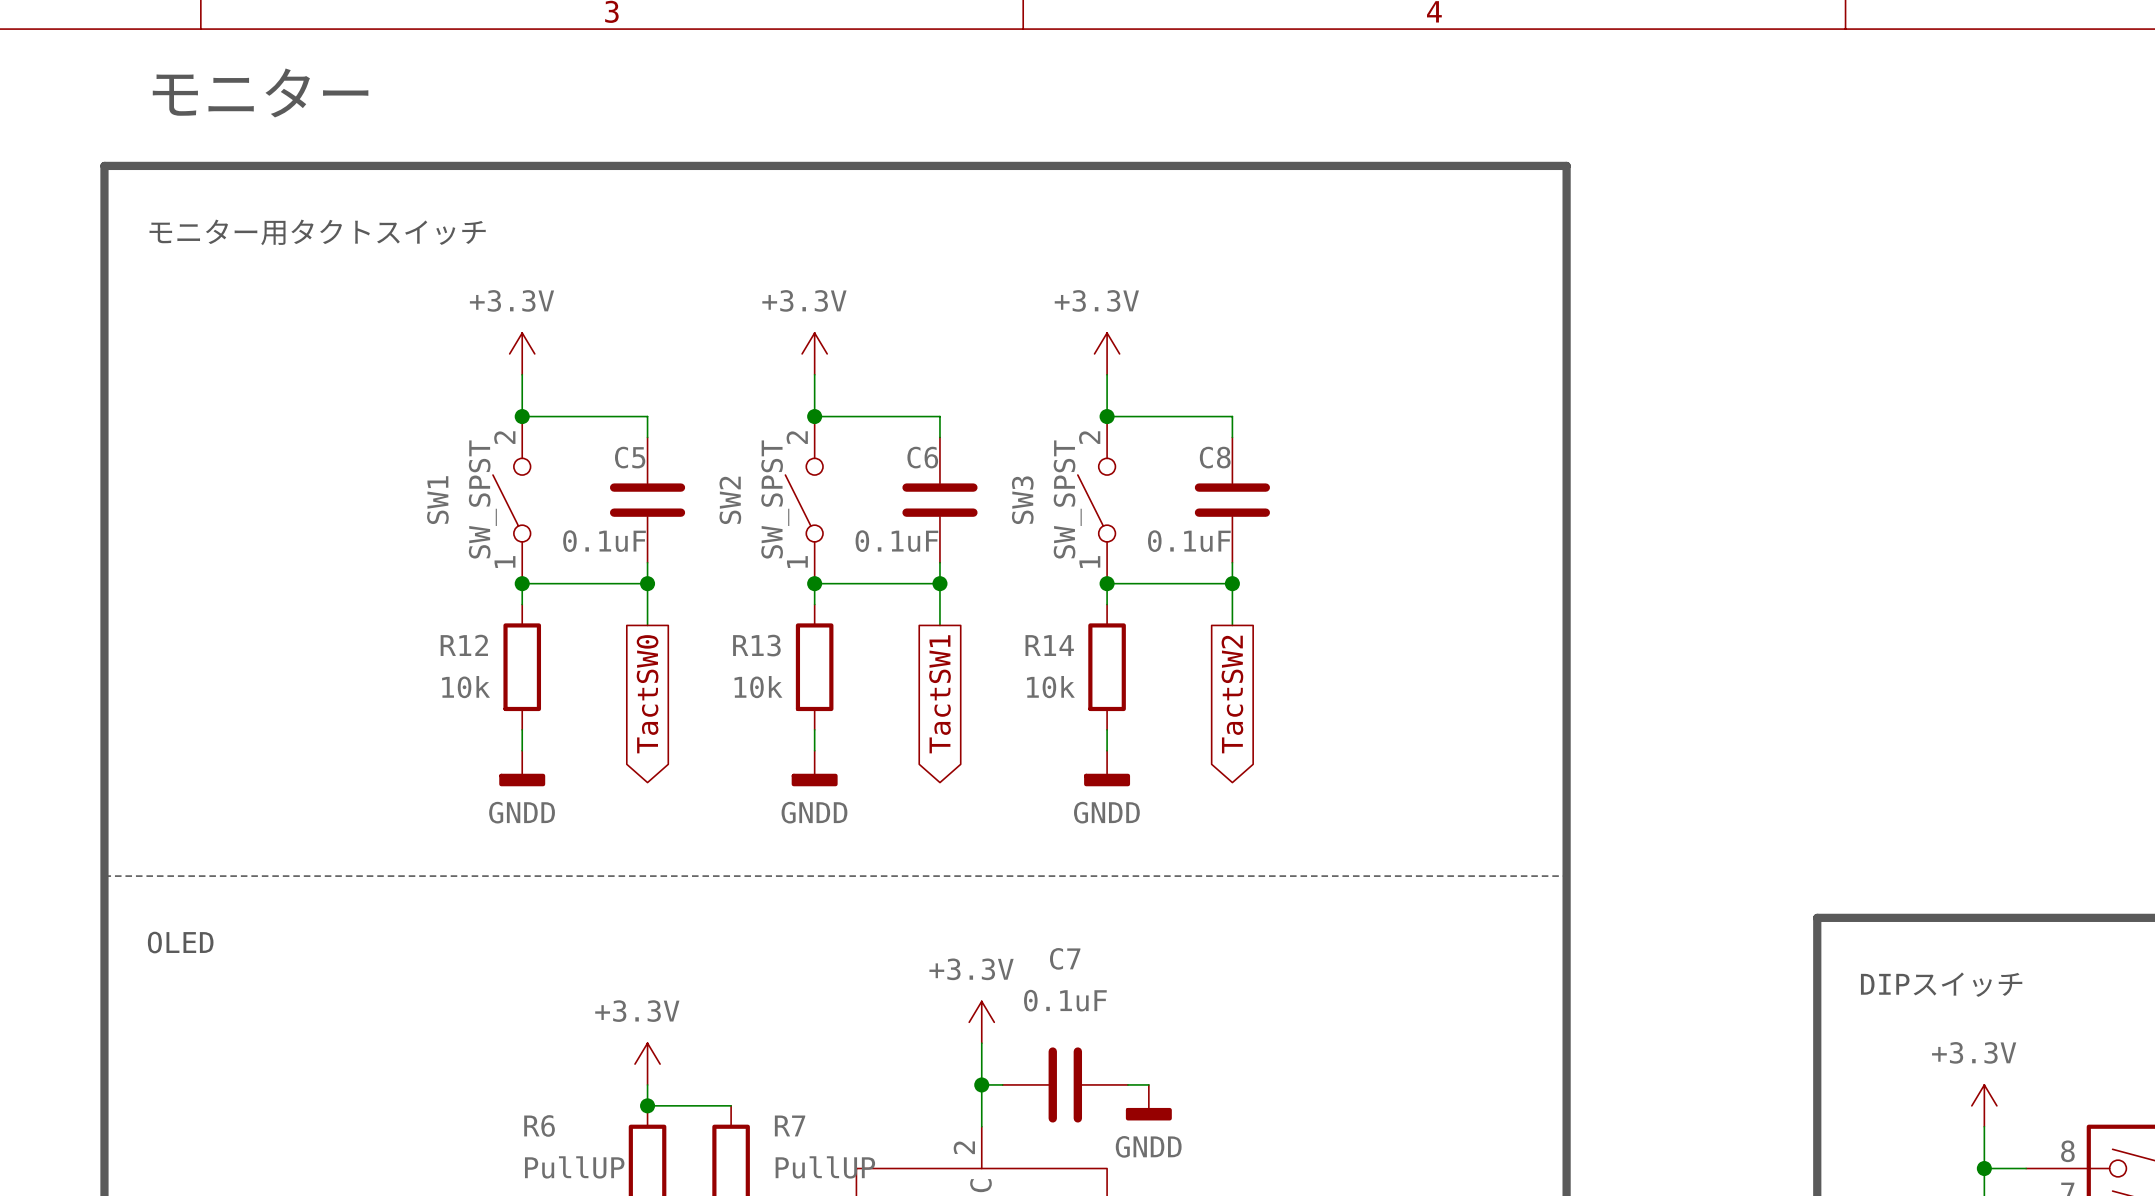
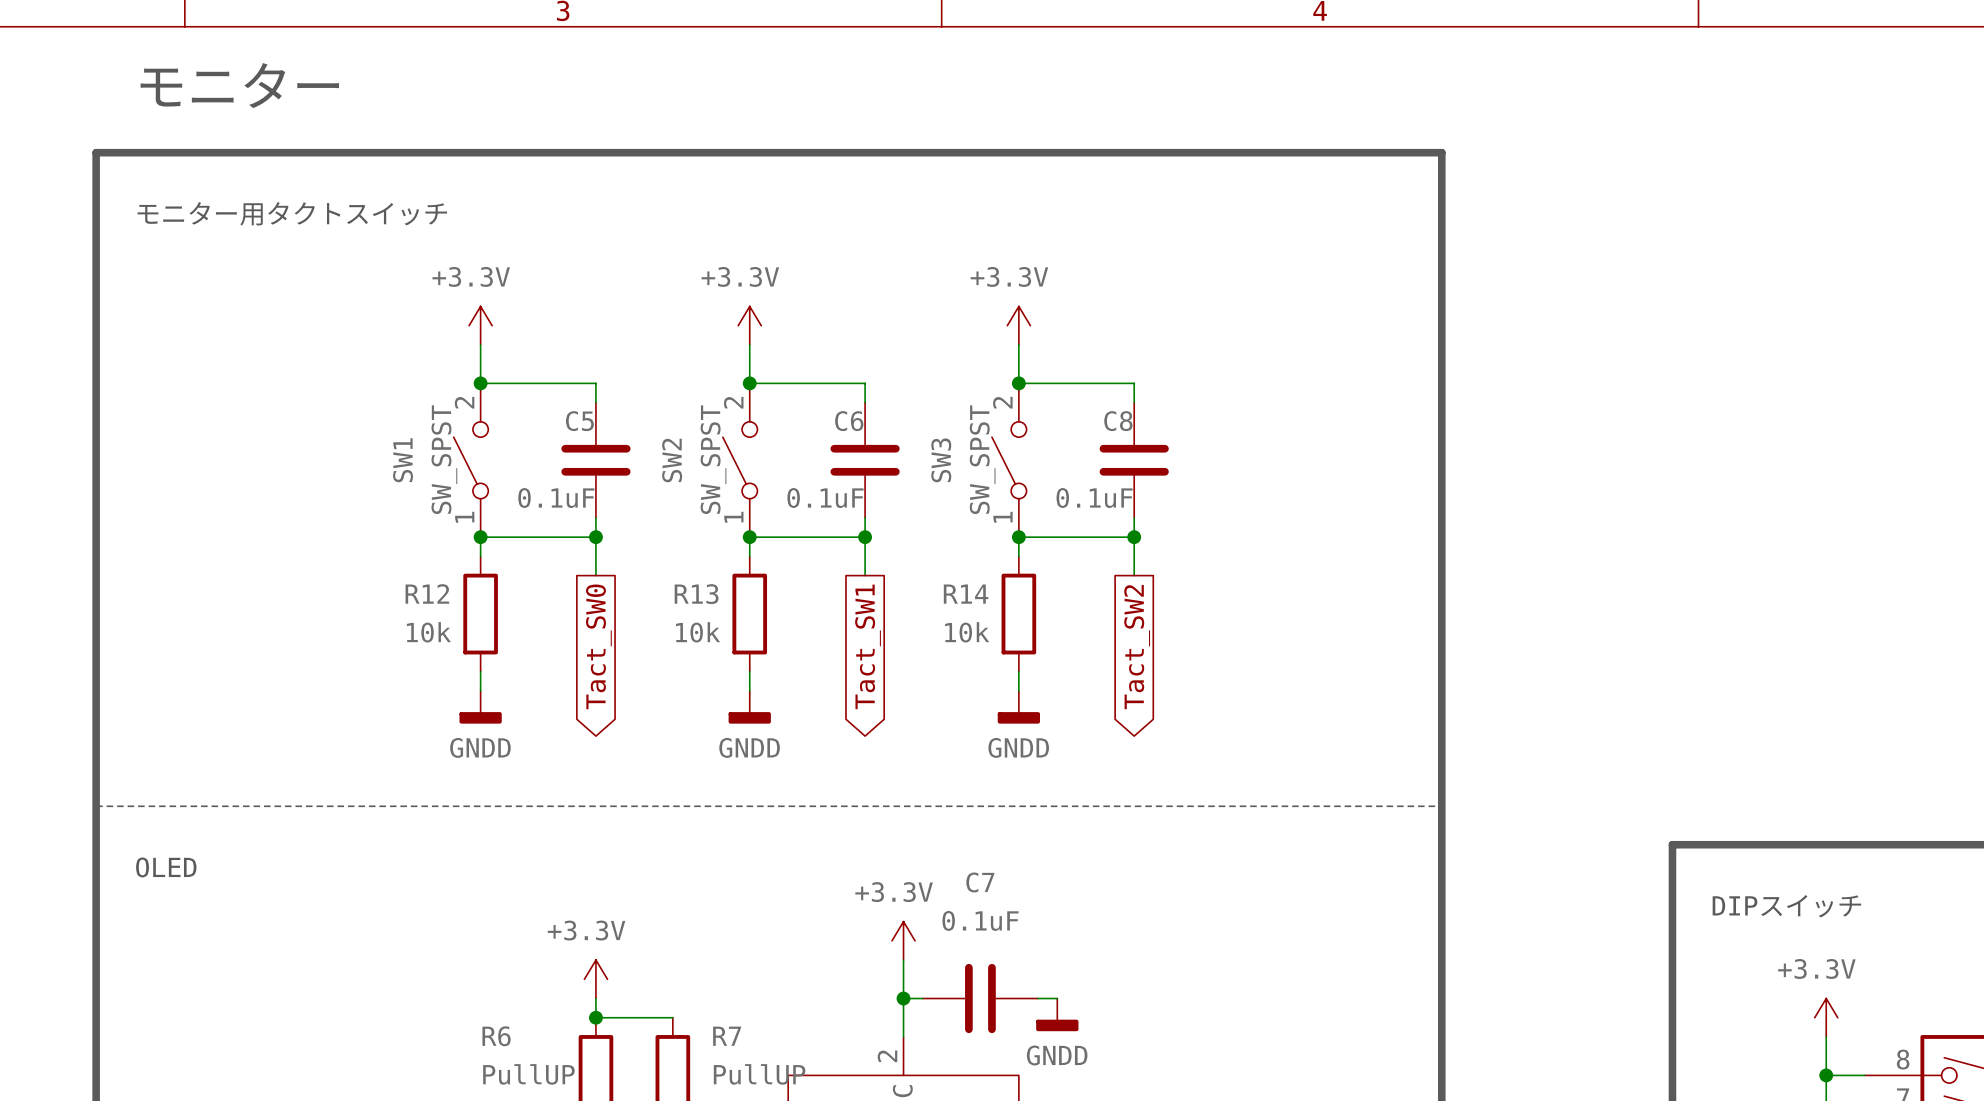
global label: TactSW0 (647, 694) -> Tact_SW0 (598, 646)
global label: TactSW1 (939, 694) -> Tact_SW1 (868, 646)
global label: TactSW2 (1232, 694) -> Tact_SW2 (1137, 647)

